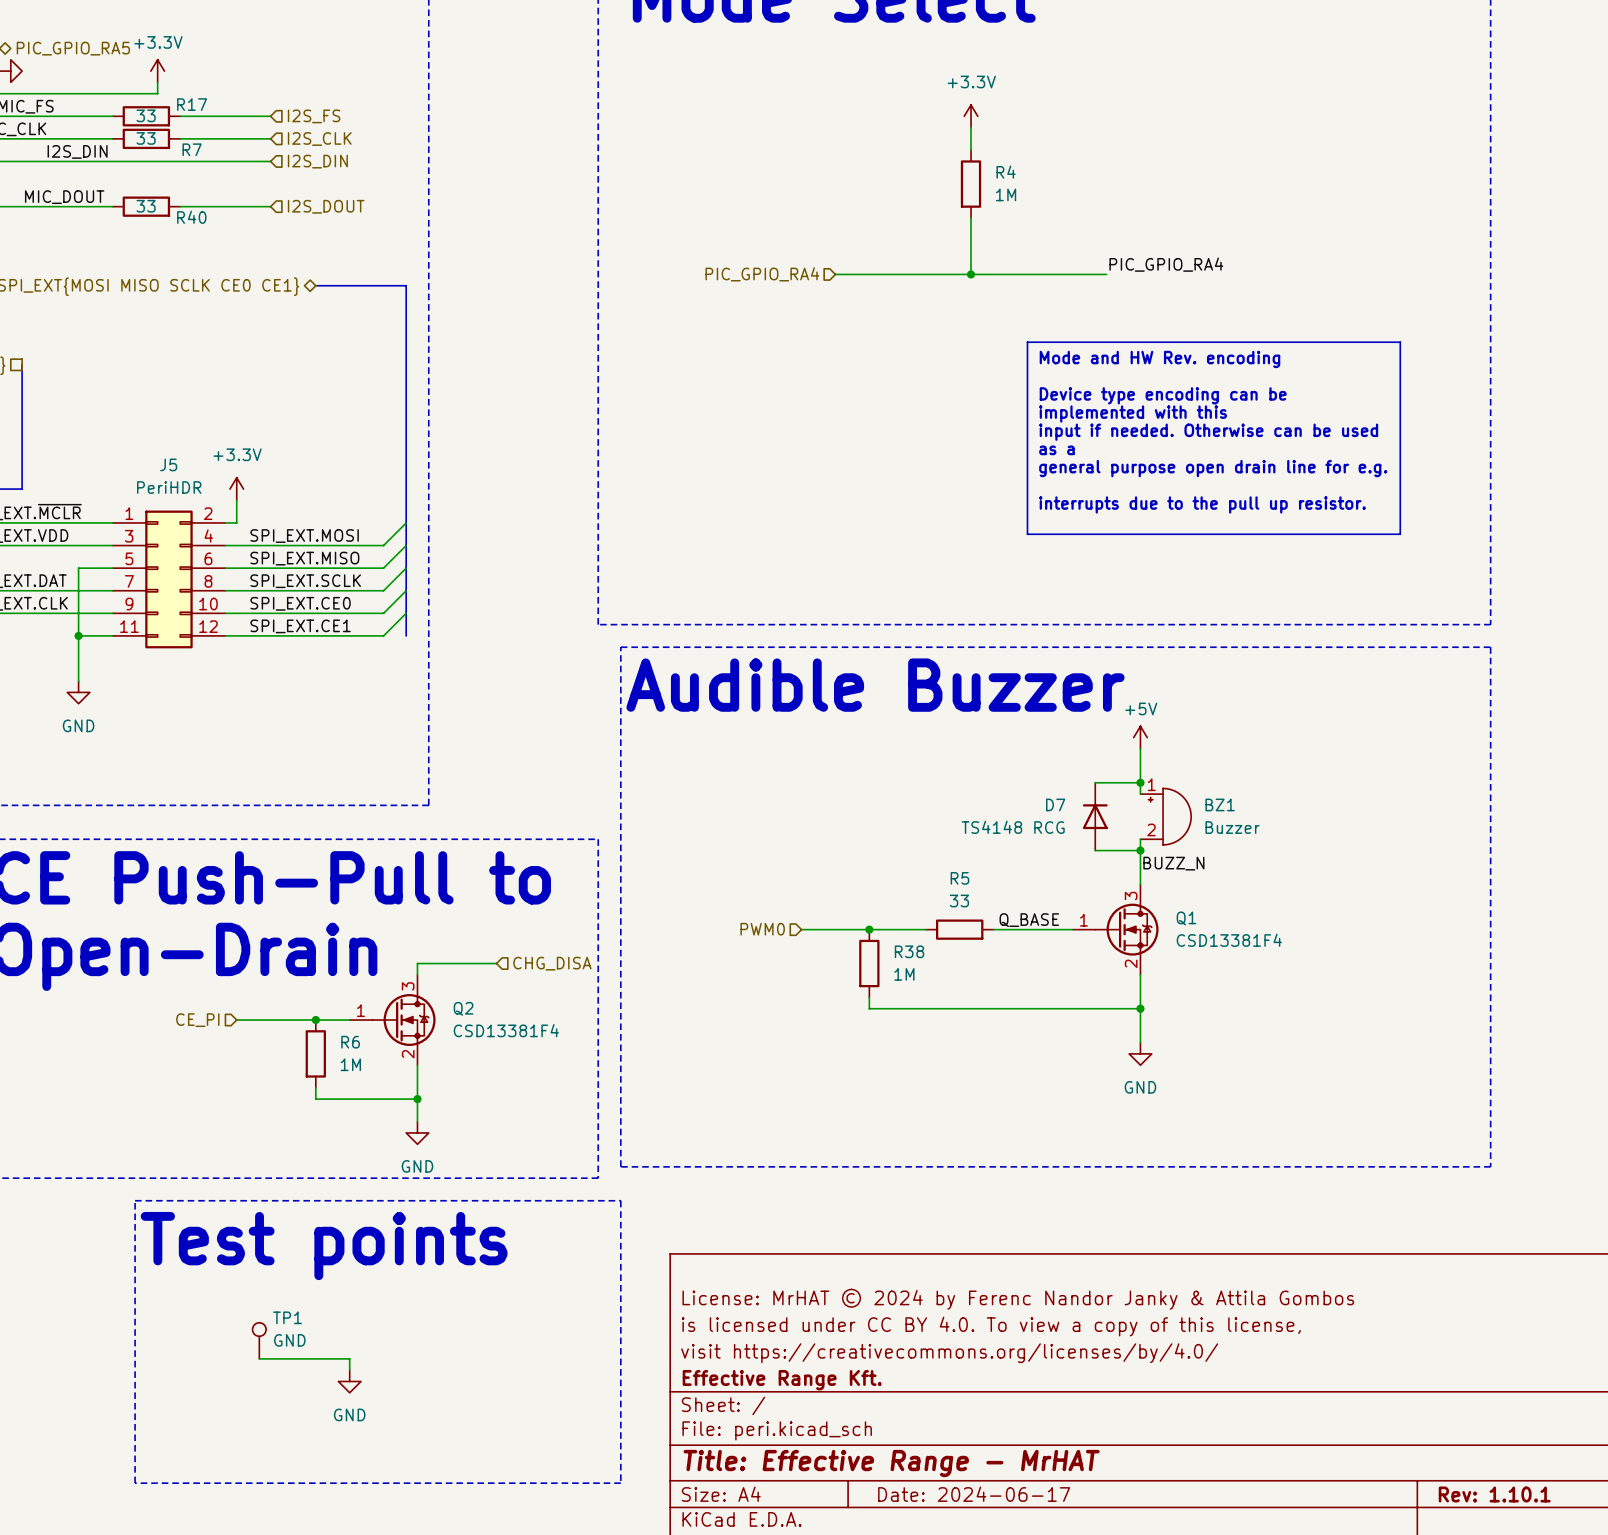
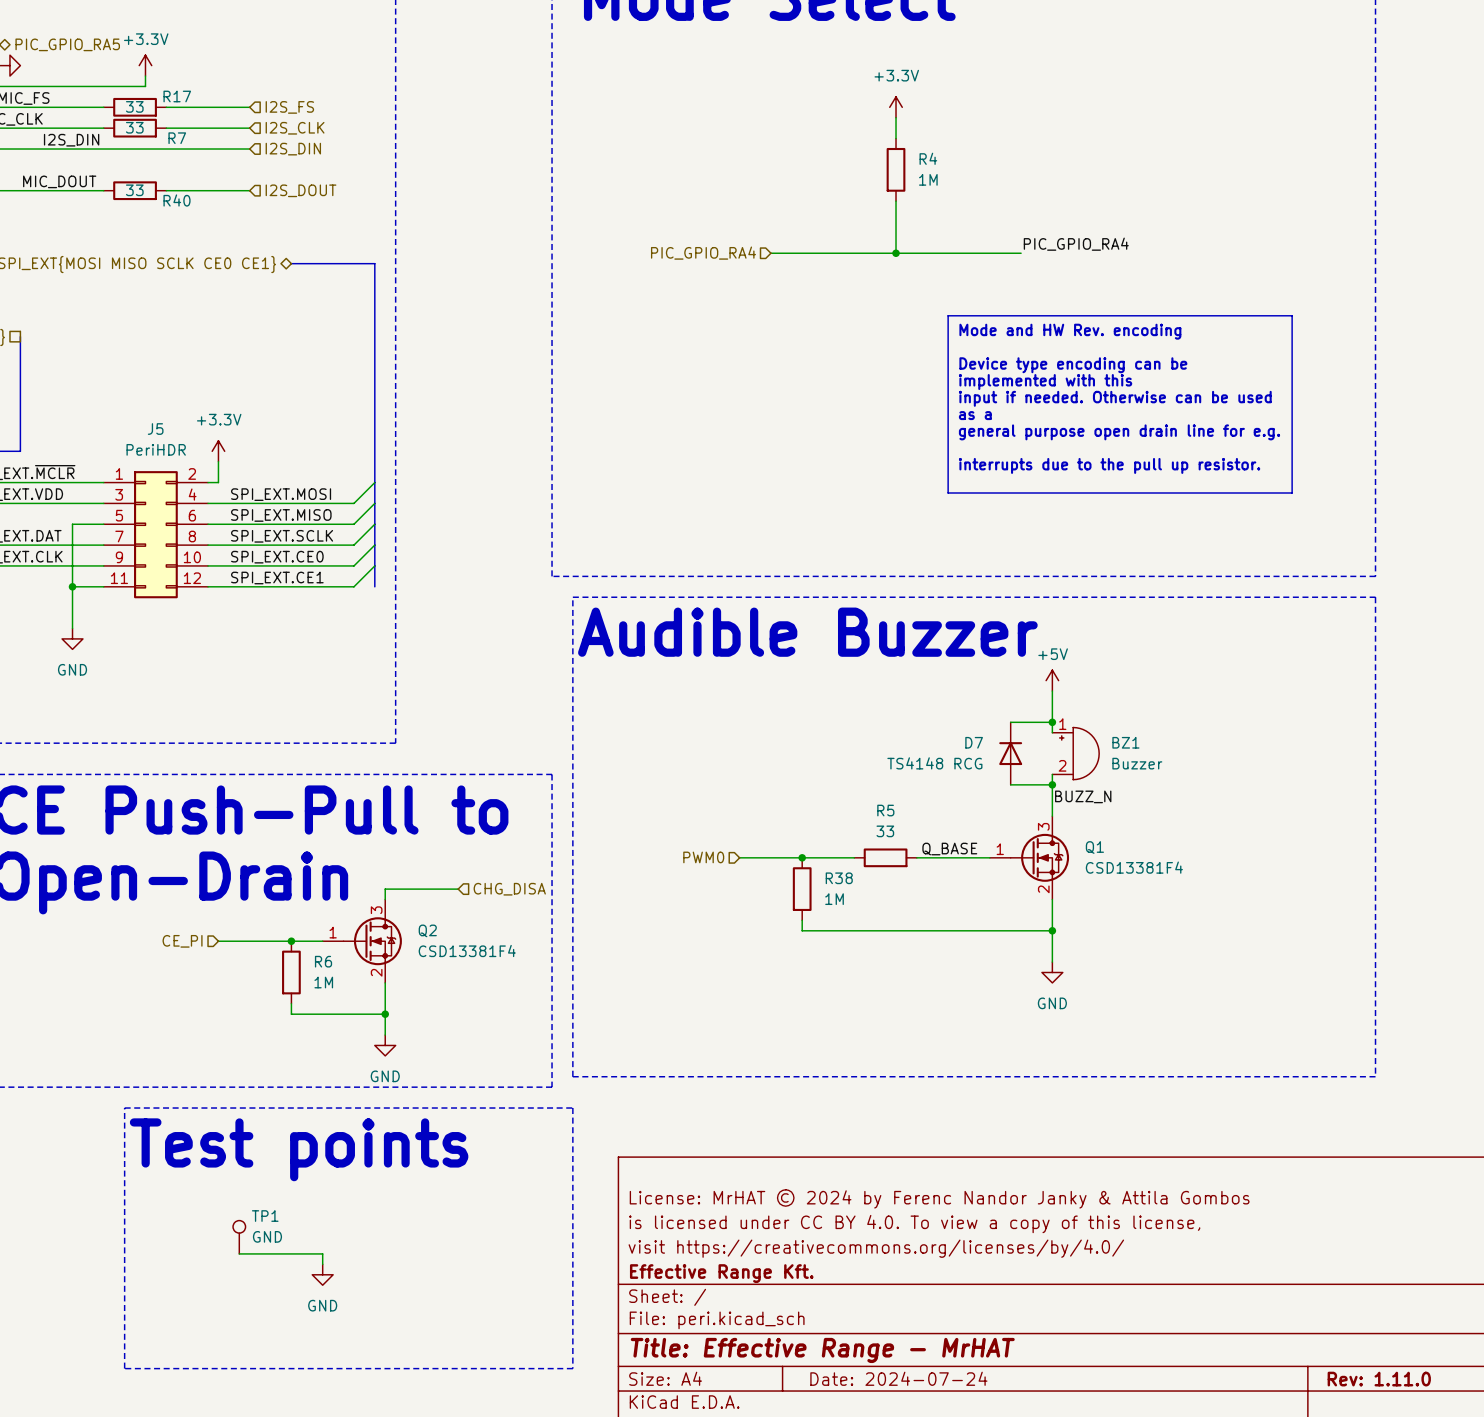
title block: Date: 2024-06-17 (974, 1494) -> Date: 2024-07-24 (898, 1378)
title block: Rev: 1.10.1 (1494, 1494) -> Rev: 1.11.0 (1379, 1379)

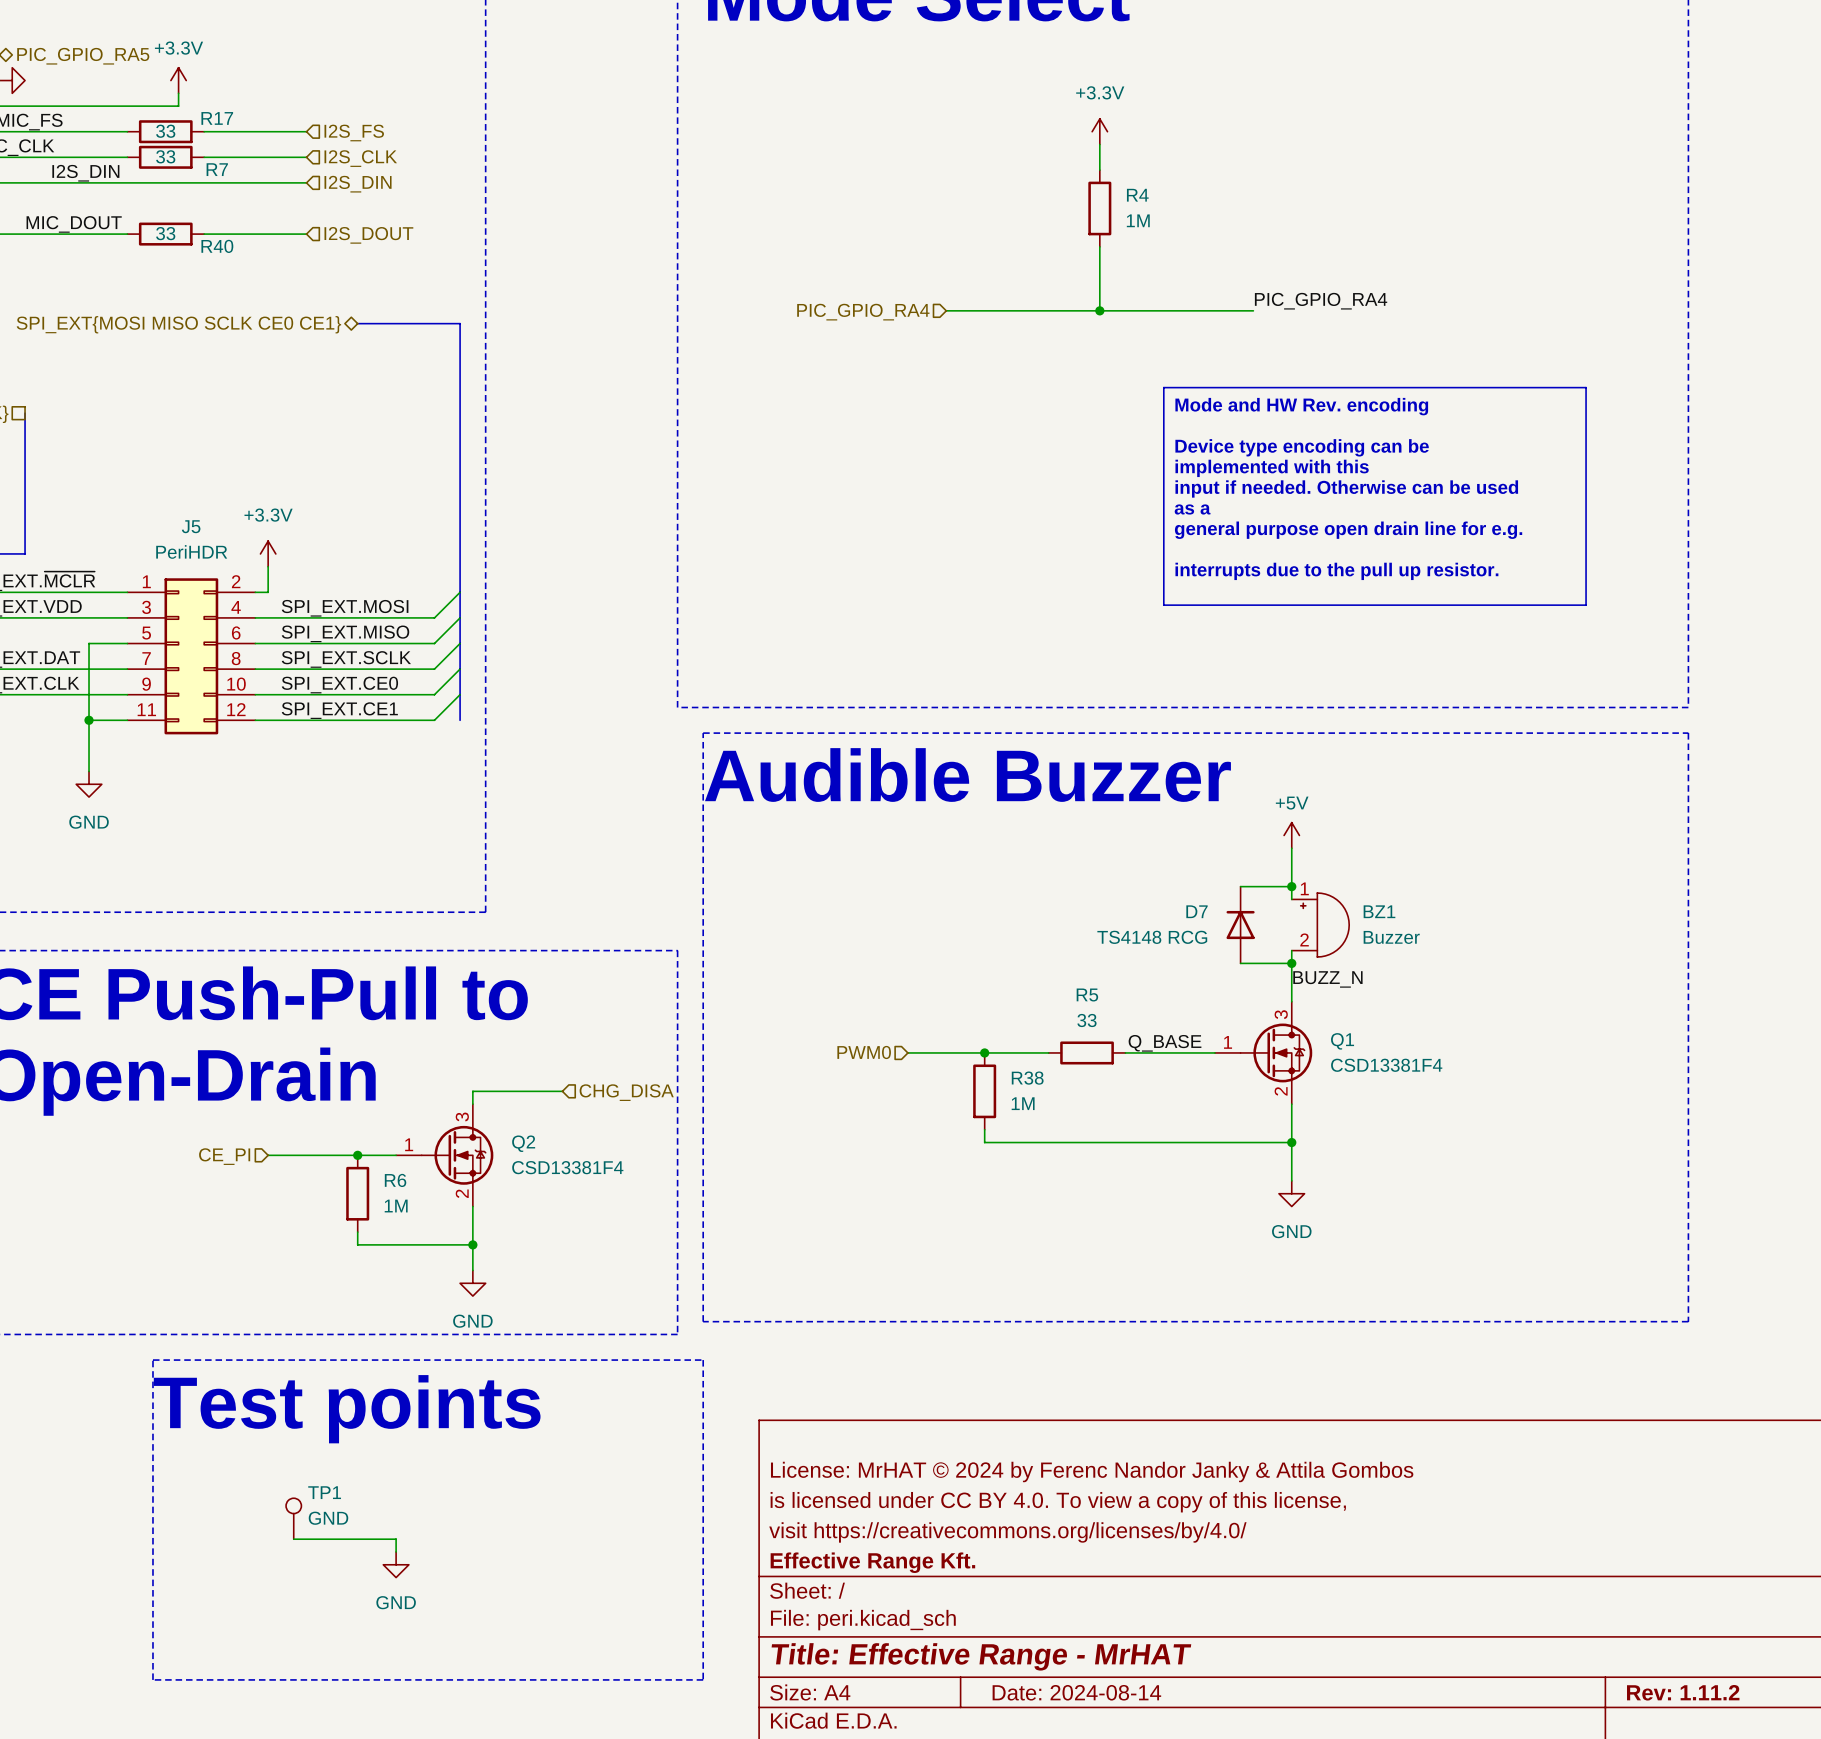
title block: Date: 2024-07-24 (898, 1378) -> Date: 2024-08-14 (1076, 1692)
title block: Rev: 1.11.0 (1379, 1379) -> Rev: 1.11.2 (1683, 1692)

